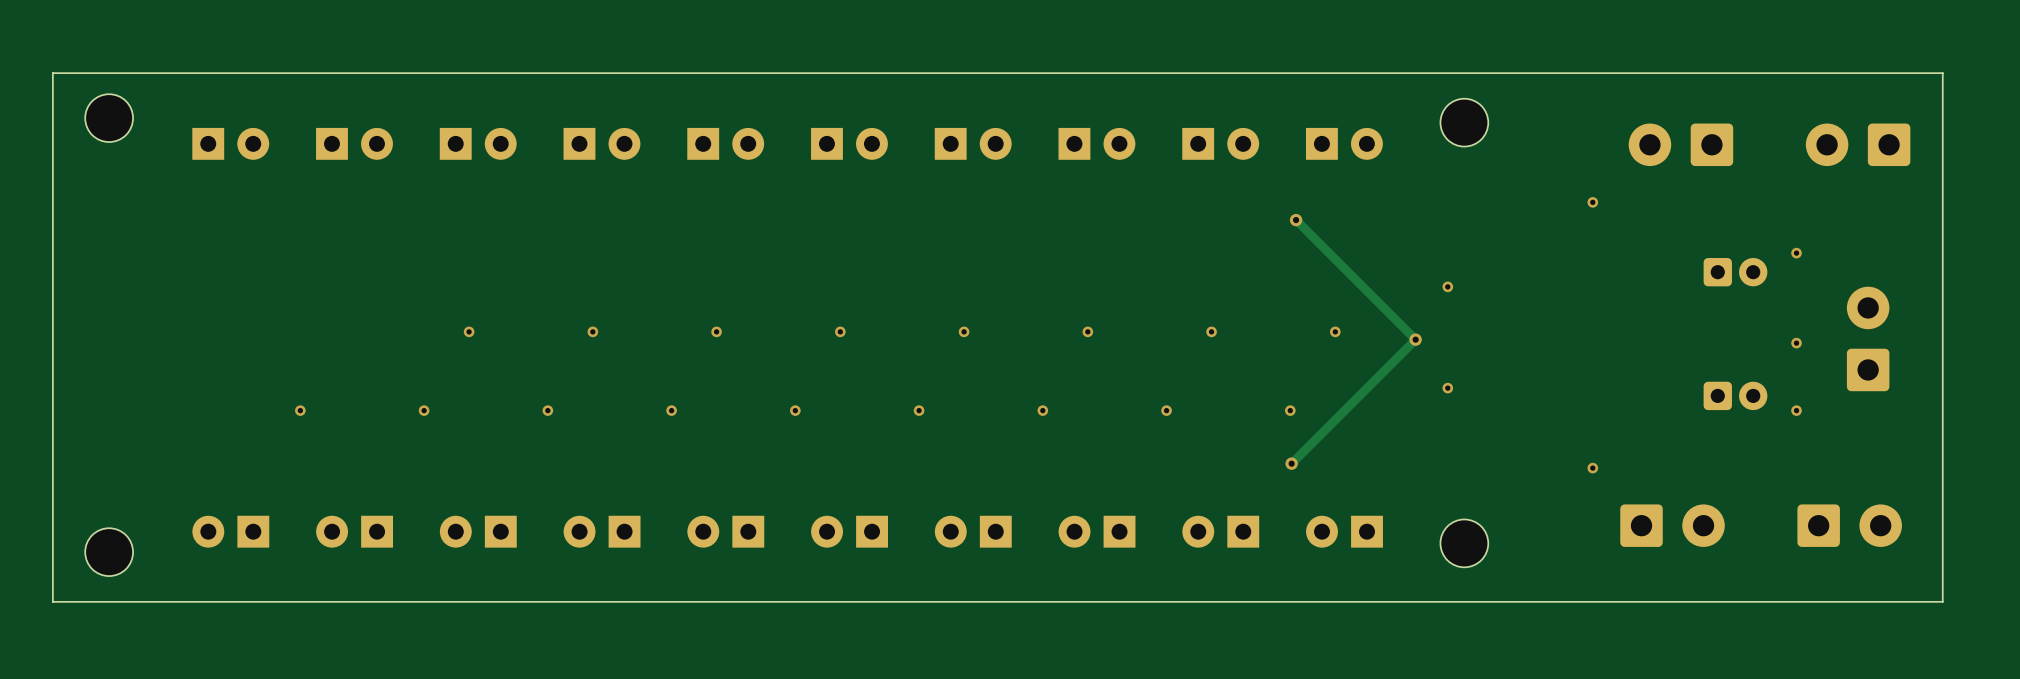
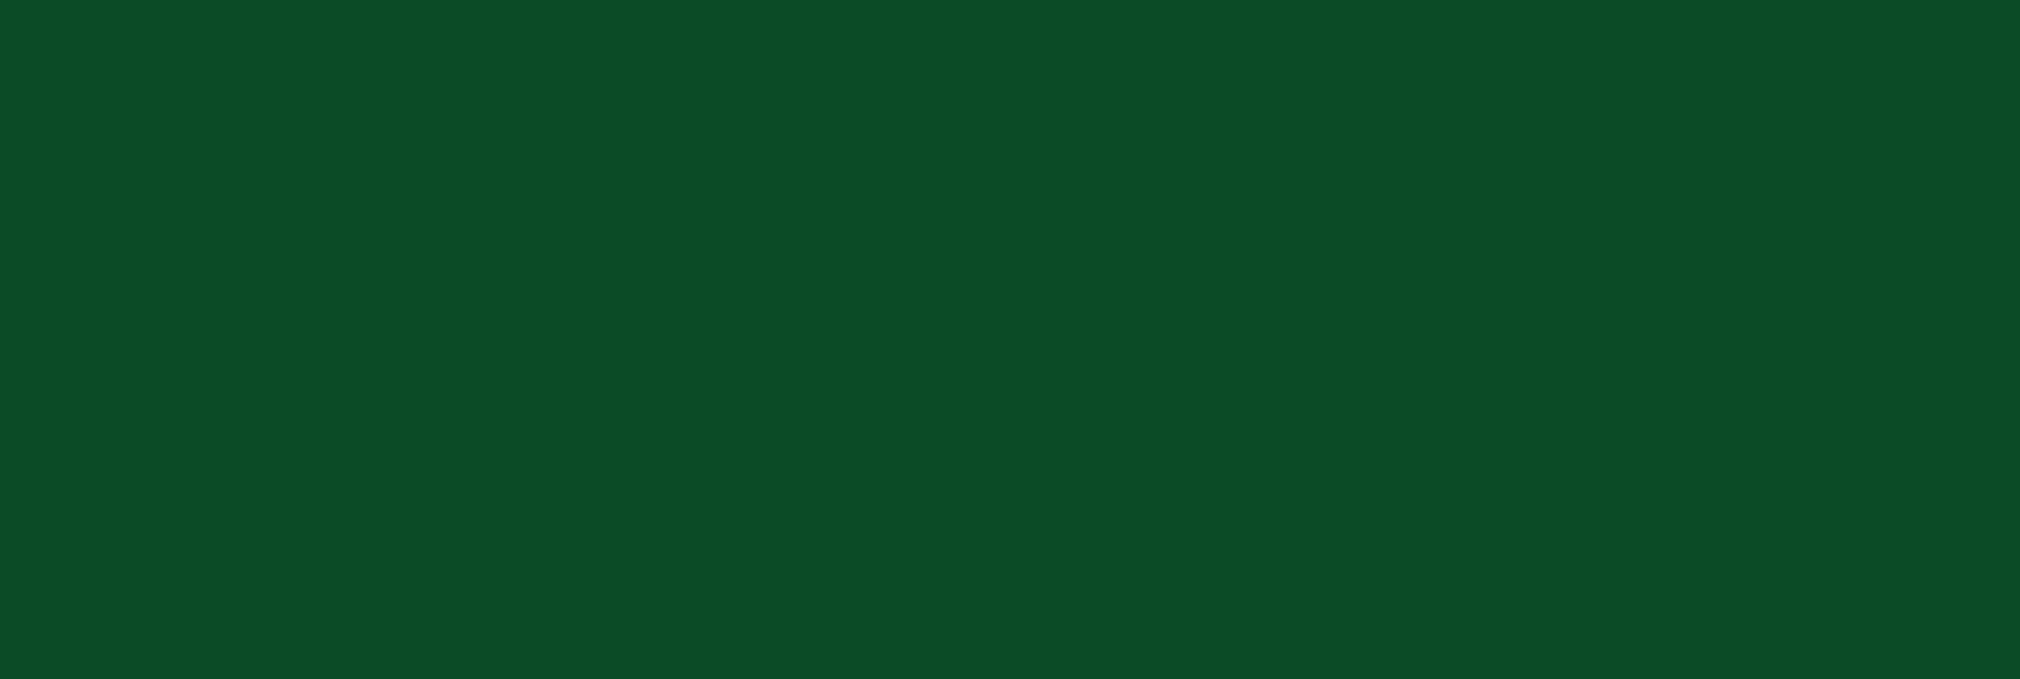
board edge: (1942, 73) (52, 73) (52, 601) (1942, 601) (1942, 73) -> none
part: (109, 118) -> none
part: (1464, 122) -> none
part: (230, 143) -> none
part: (354, 143) -> none
part: (478, 143) -> none
part: (601, 143) -> none
part: (725, 143) -> none
part: (849, 143) -> none
part: (973, 143) -> none
part: (1096, 143) -> none
part: (1220, 143) -> none
part: (1344, 143) -> none
part: (1680, 144) -> none
part: (1858, 144) -> none
via: (1592, 202) -> none
track: (1296, 220) (1415, 339) (1291, 463) -> none
via: (1296, 220) -> none
via: (1796, 253) -> none
part: (1735, 272) -> none
via: (1447, 286) -> none
via: (469, 331) -> none
via: (592, 331) -> none
via: (716, 331) -> none
via: (840, 331) -> none
via: (964, 331) -> none
via: (1087, 331) -> none
via: (1211, 331) -> none
via: (1335, 331) -> none
part: (1868, 338) -> none
via: (1415, 339) -> none
via: (1796, 343) -> none
via: (1447, 388) -> none
part: (1735, 395) -> none
via: (300, 410) -> none
via: (424, 410) -> none
via: (547, 410) -> none
via: (671, 410) -> none
via: (795, 410) -> none
via: (919, 410) -> none
via: (1042, 410) -> none
via: (1166, 410) -> none
via: (1290, 410) -> none
via: (1796, 410) -> none
via: (1291, 463) -> none
via: (1592, 468) -> none
part: (1672, 525) -> none
part: (1849, 525) -> none
part: (230, 531) -> none
part: (354, 531) -> none
part: (478, 531) -> none
part: (602, 531) -> none
part: (725, 531) -> none
part: (849, 531) -> none
part: (973, 531) -> none
part: (1097, 531) -> none
part: (1220, 531) -> none
part: (1344, 531) -> none
part: (1464, 543) -> none
part: (109, 552) -> none

